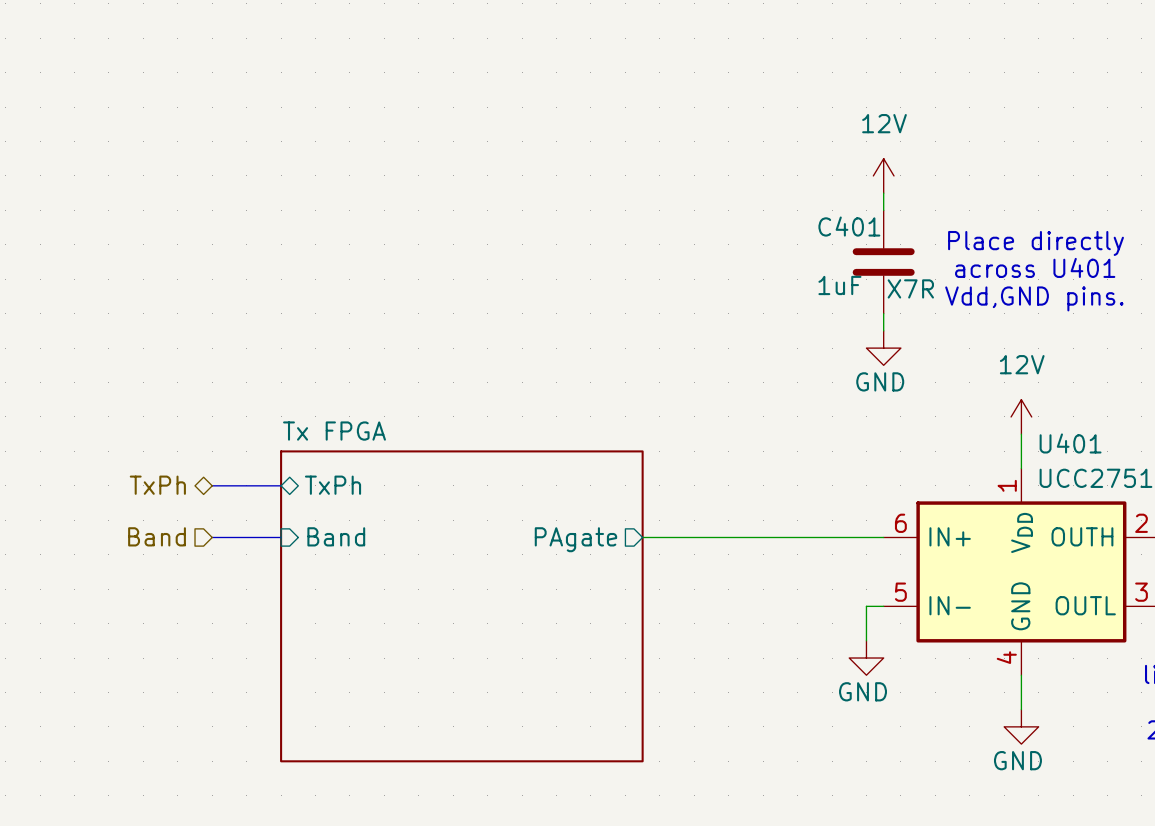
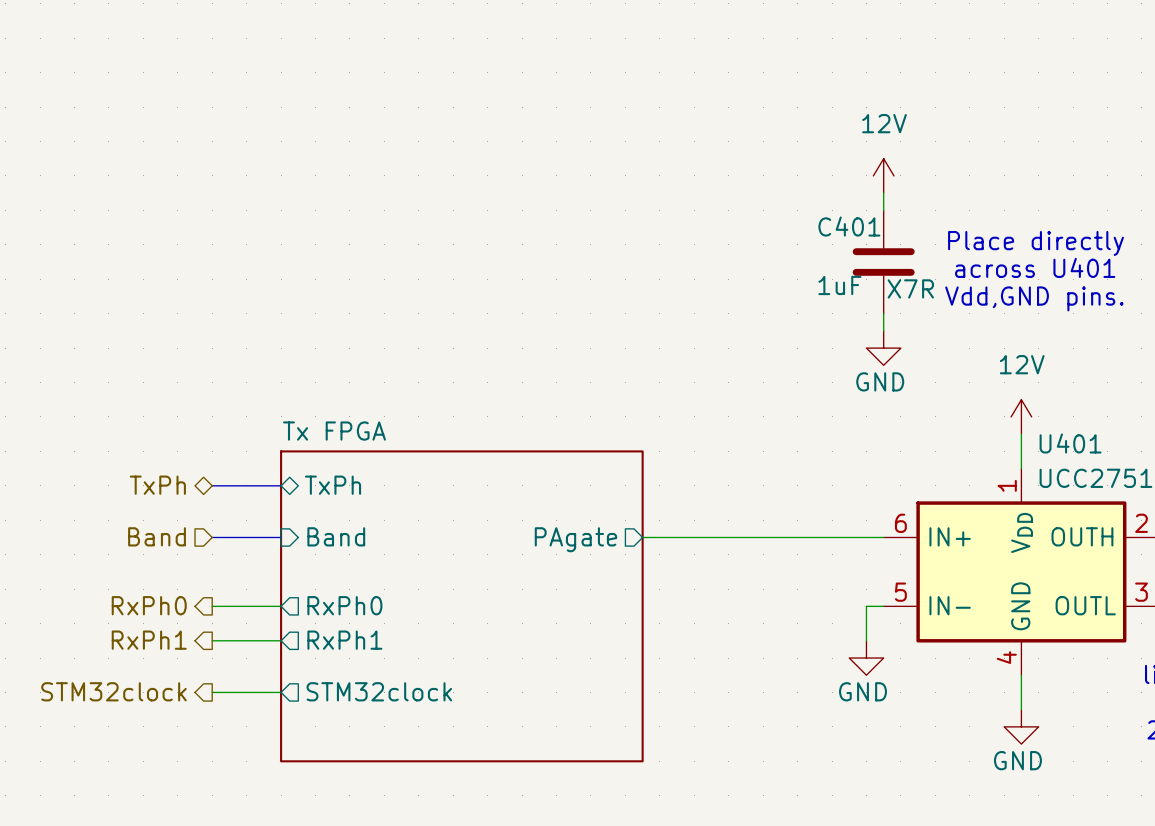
hierarchical label: none -> RxPh0 (149, 605)
sheet pin: none -> RxPh0 (344, 605)
wire: none -> (212, 606) (281, 606)
hierarchical label: none -> RxPh1 (149, 640)
wire: none -> (212, 640) (281, 640)
sheet pin: none -> RxPh1 (344, 640)
hierarchical label: none -> STM32clock (113, 691)
sheet pin: none -> STM32clock (379, 691)
wire: none -> (212, 692) (281, 692)

